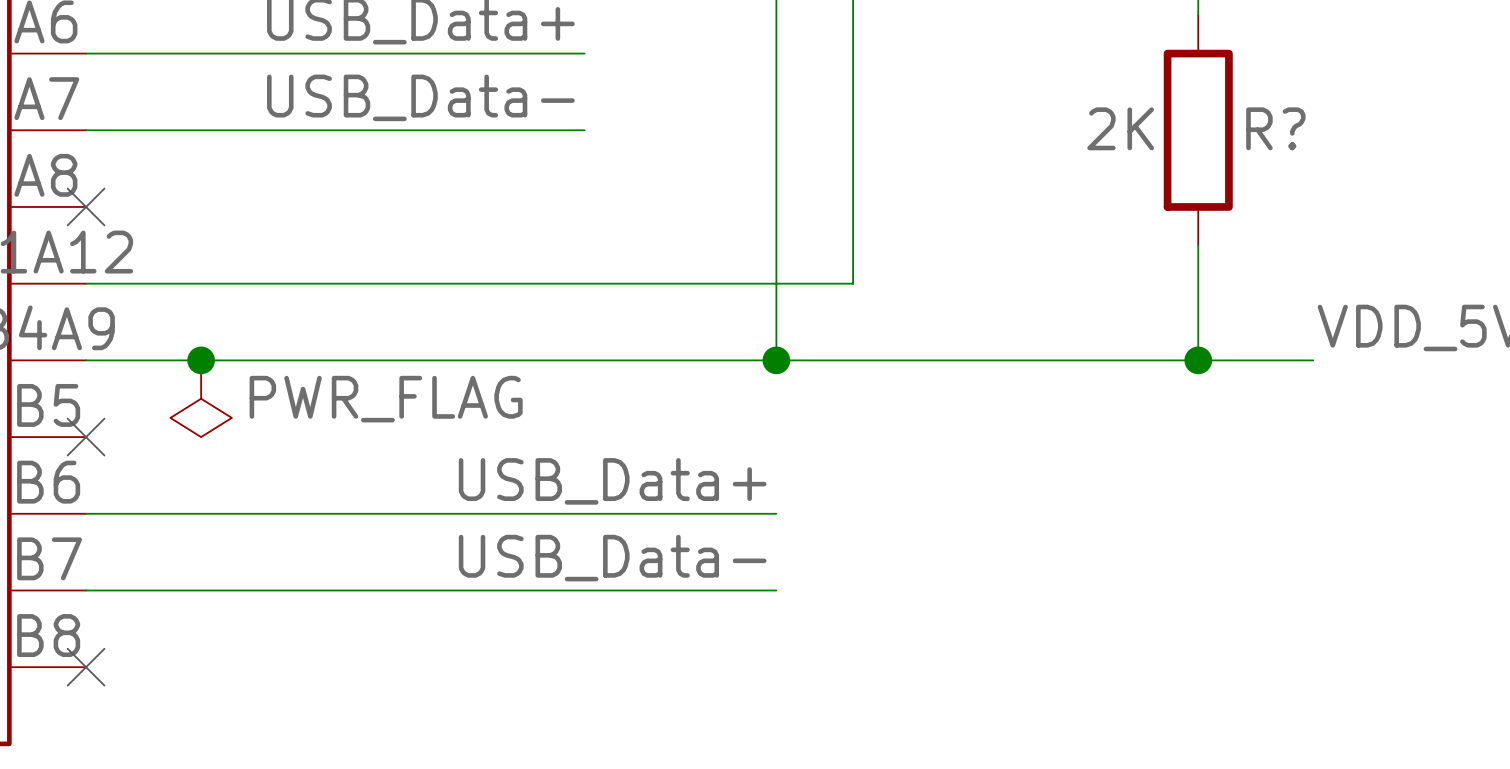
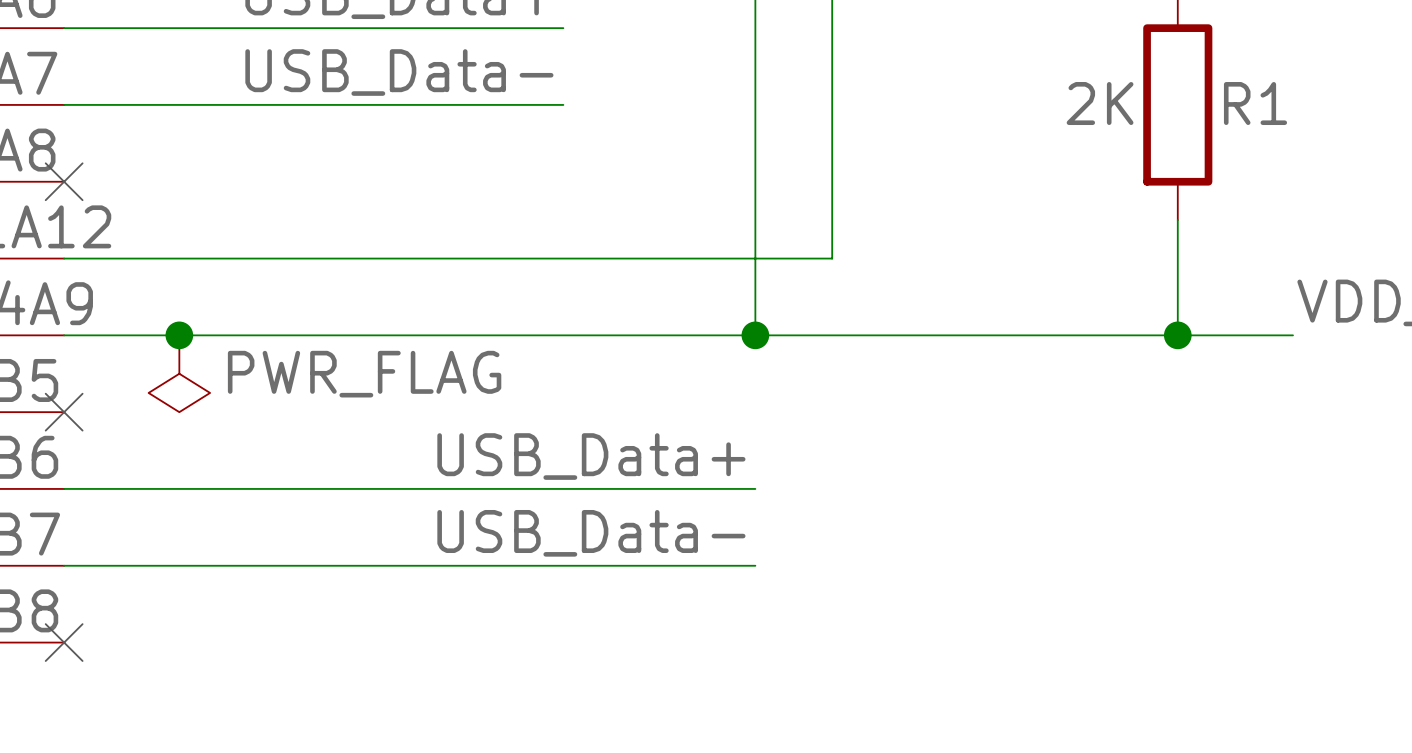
R? name: R? (1275, 128) -> R1 (1255, 103)

